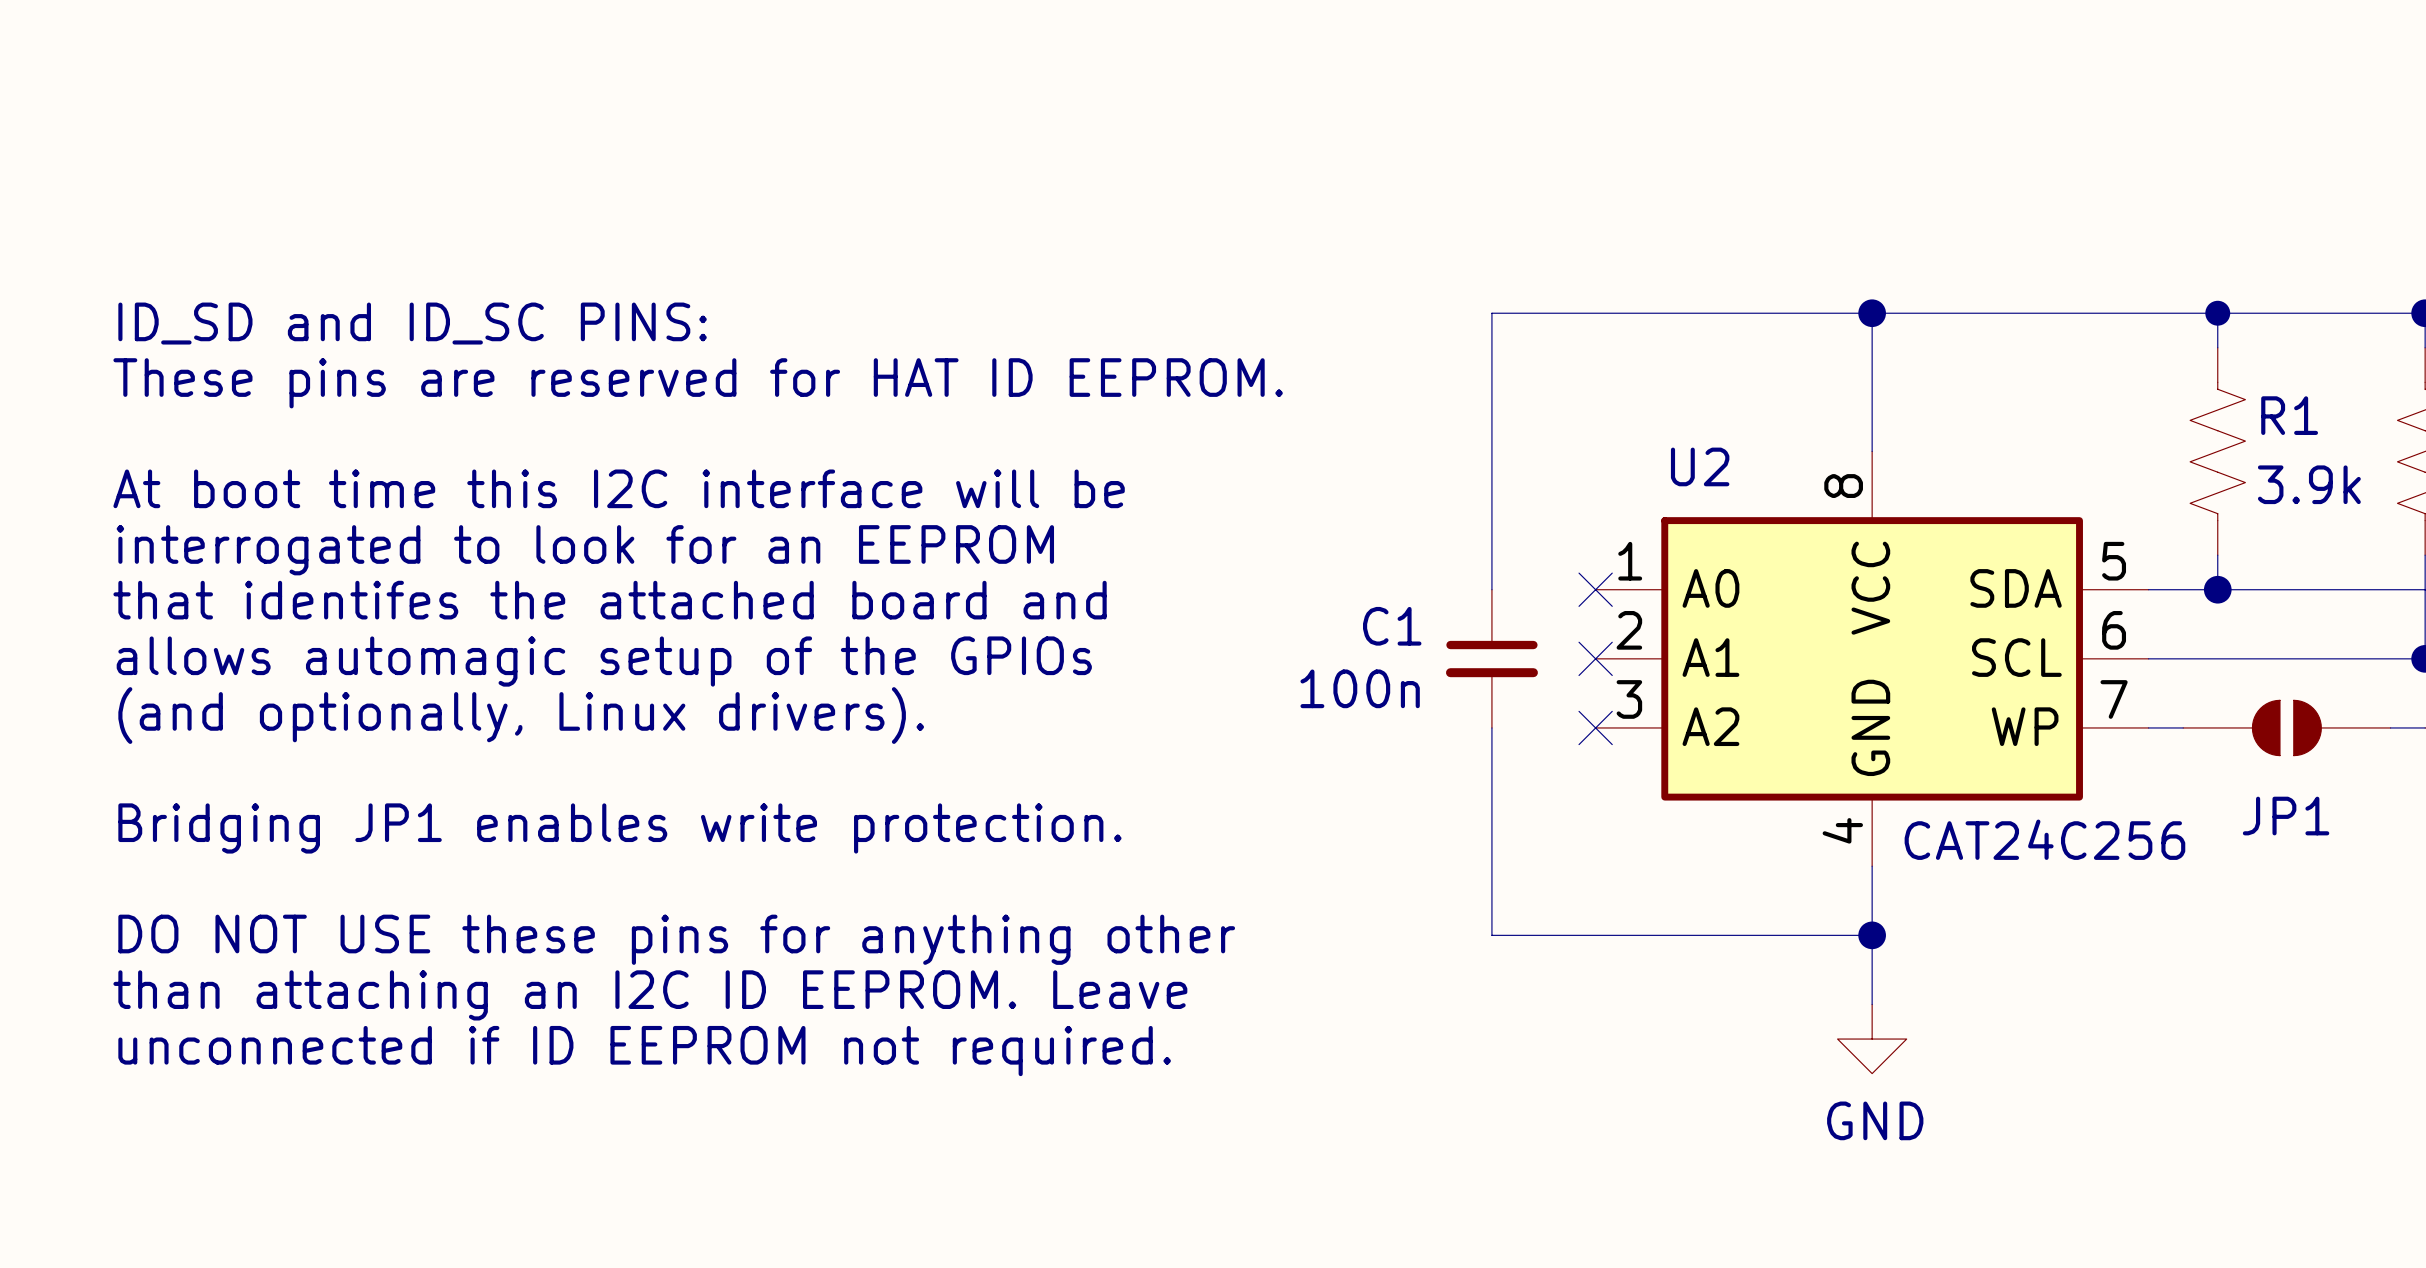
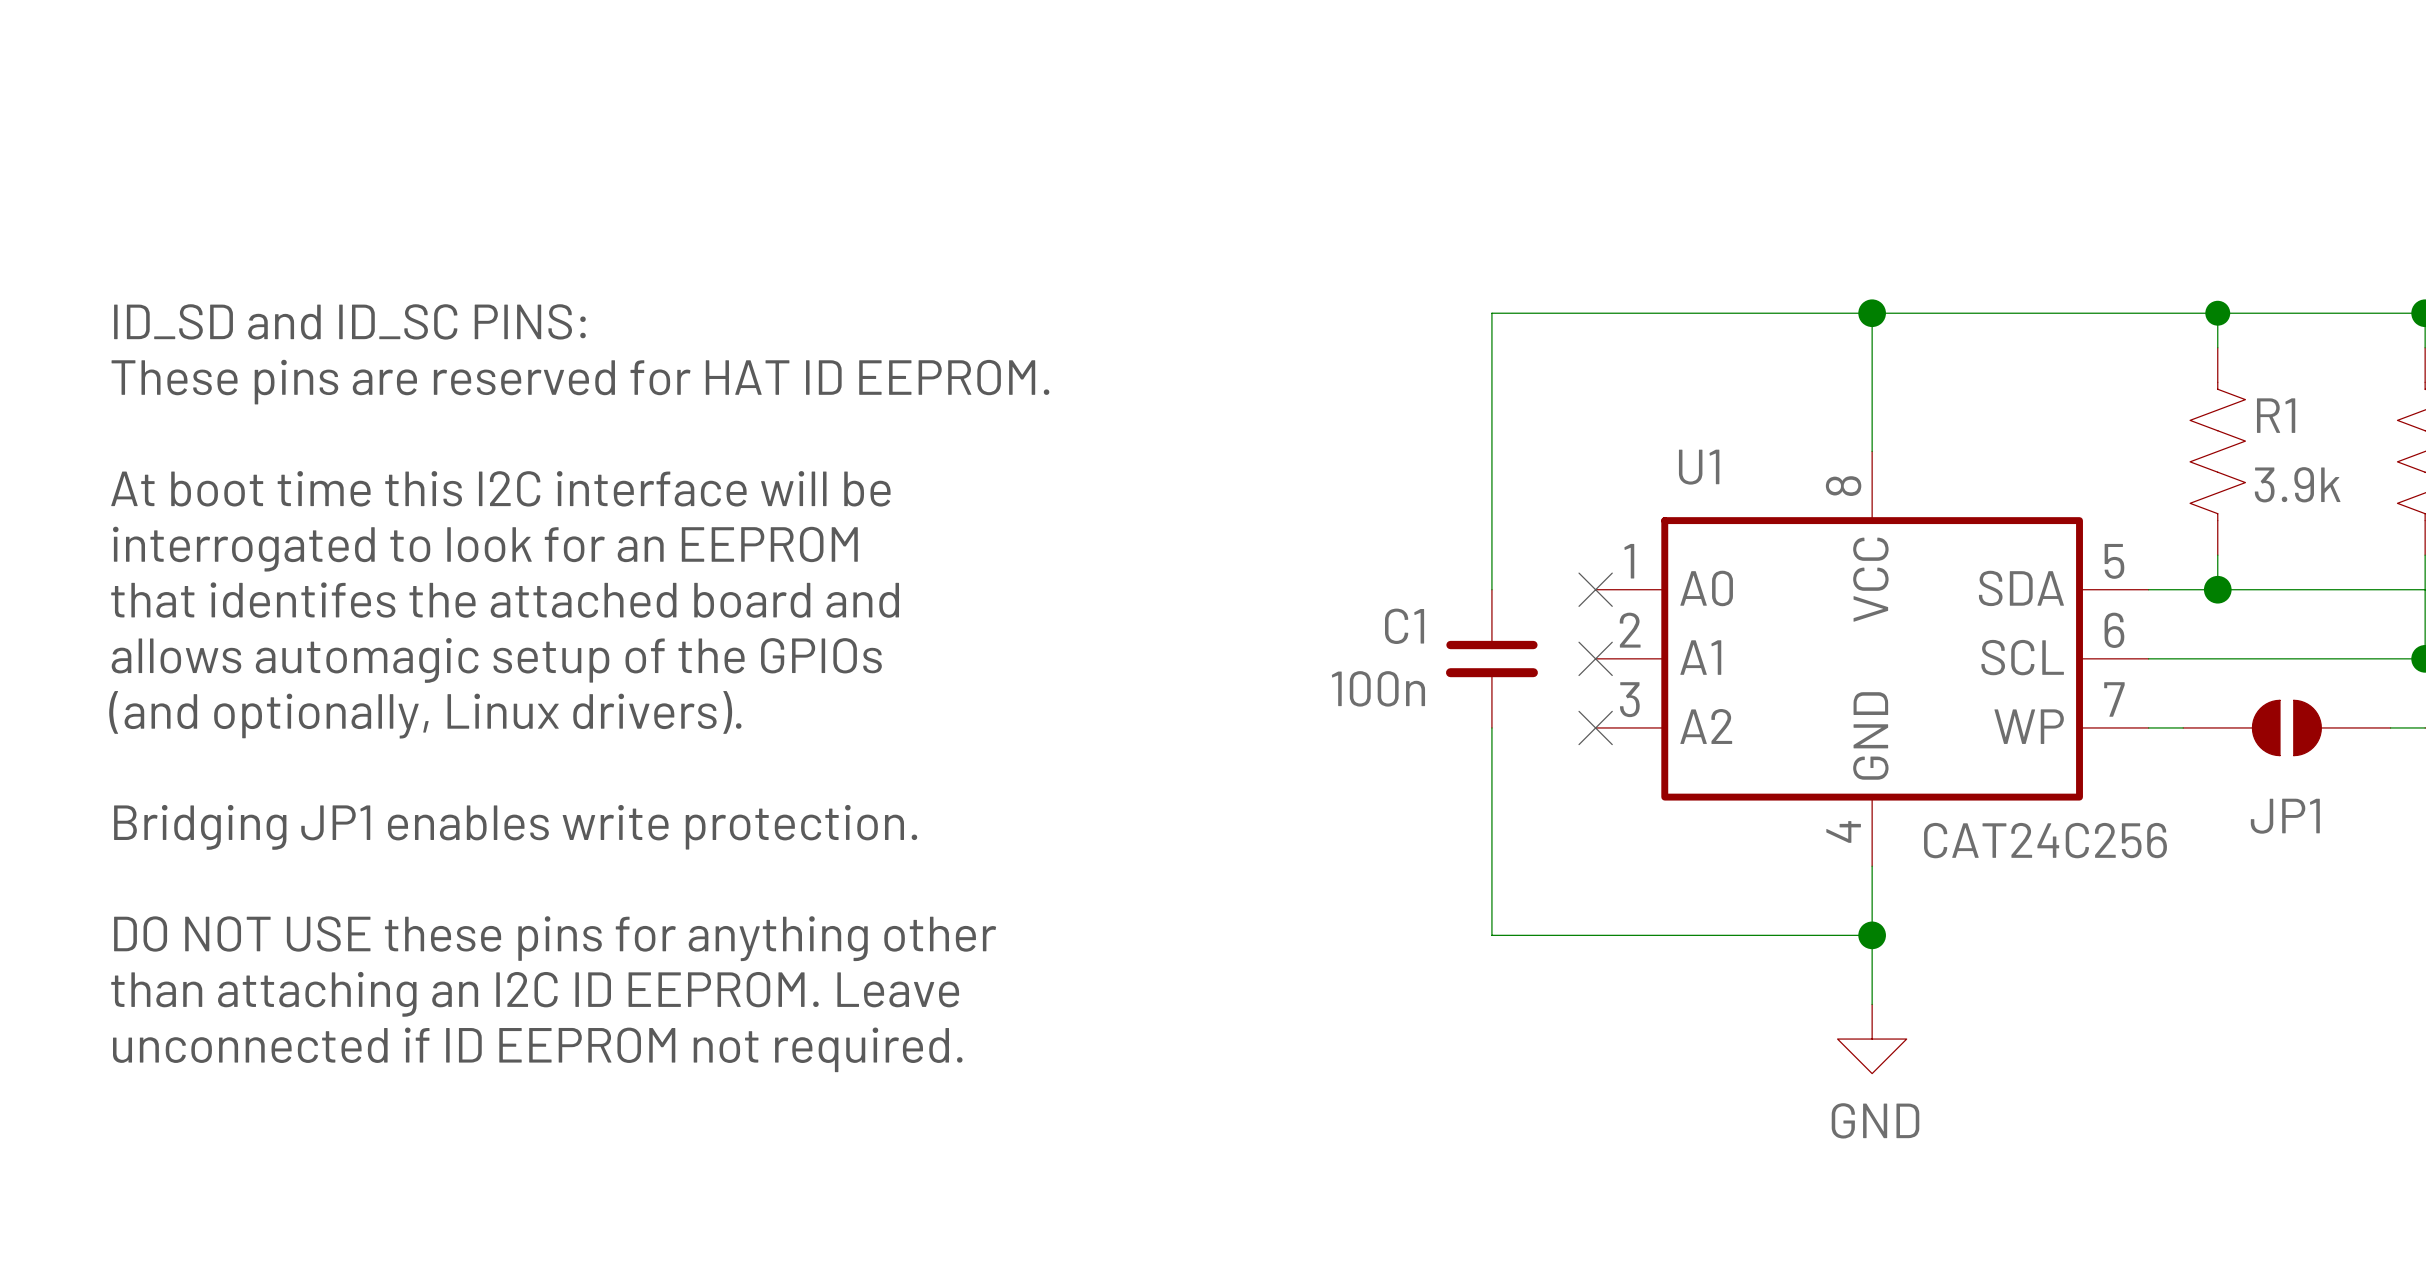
U2 name: U2 (1700, 466) -> U1 (1699, 467)

